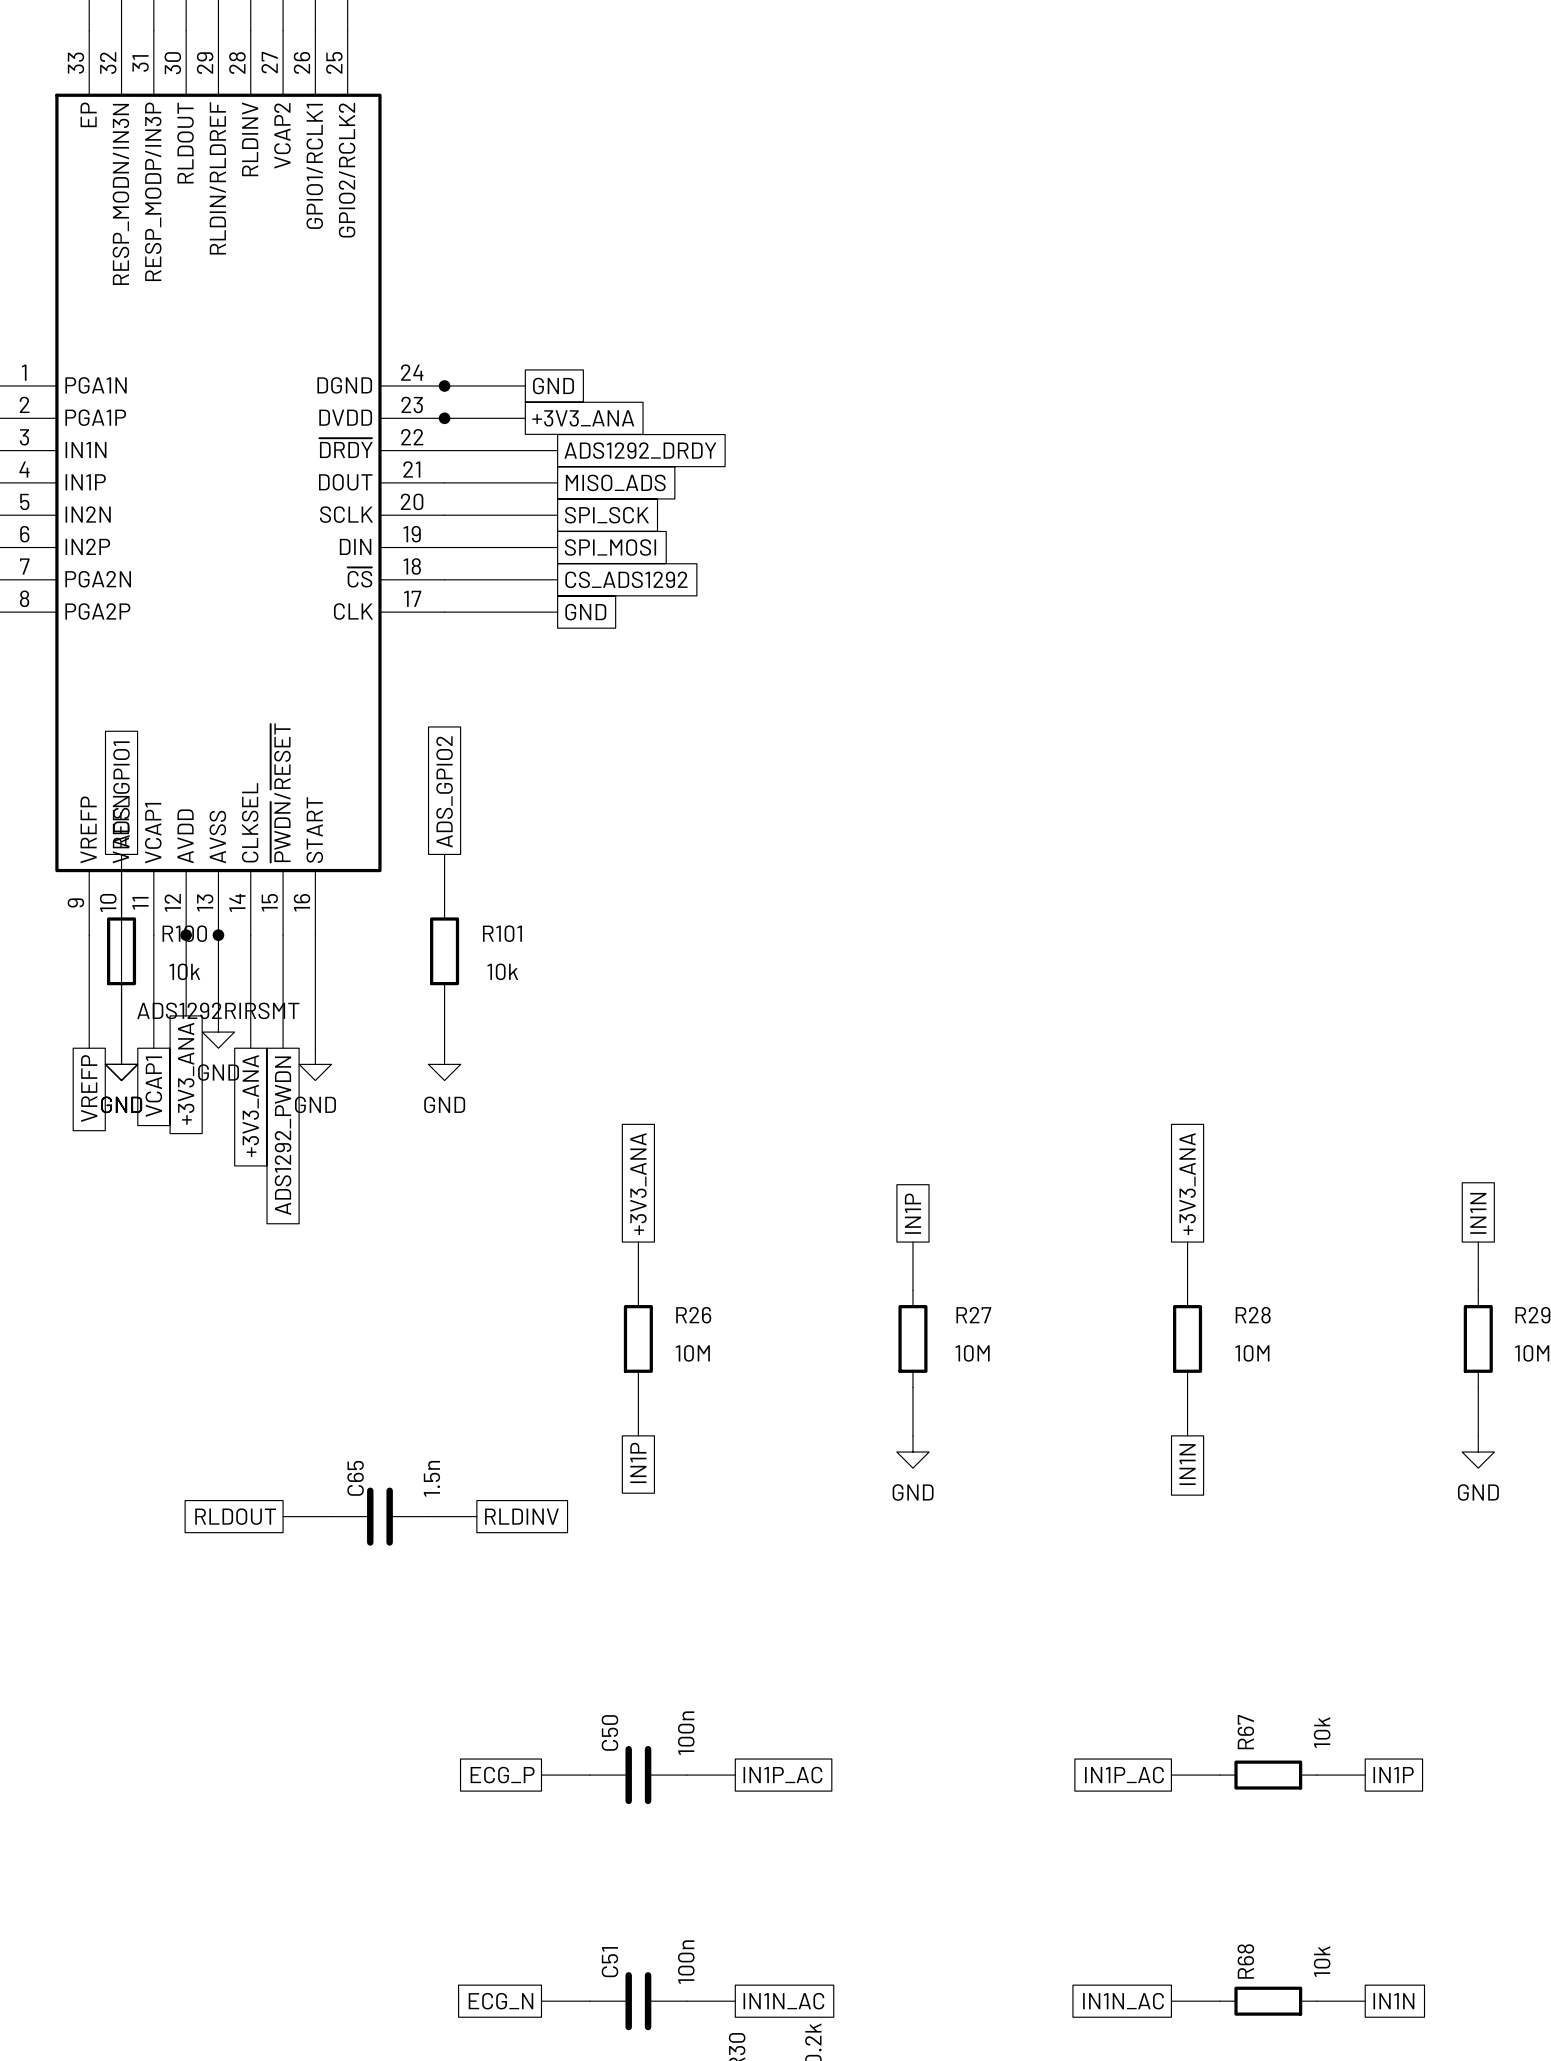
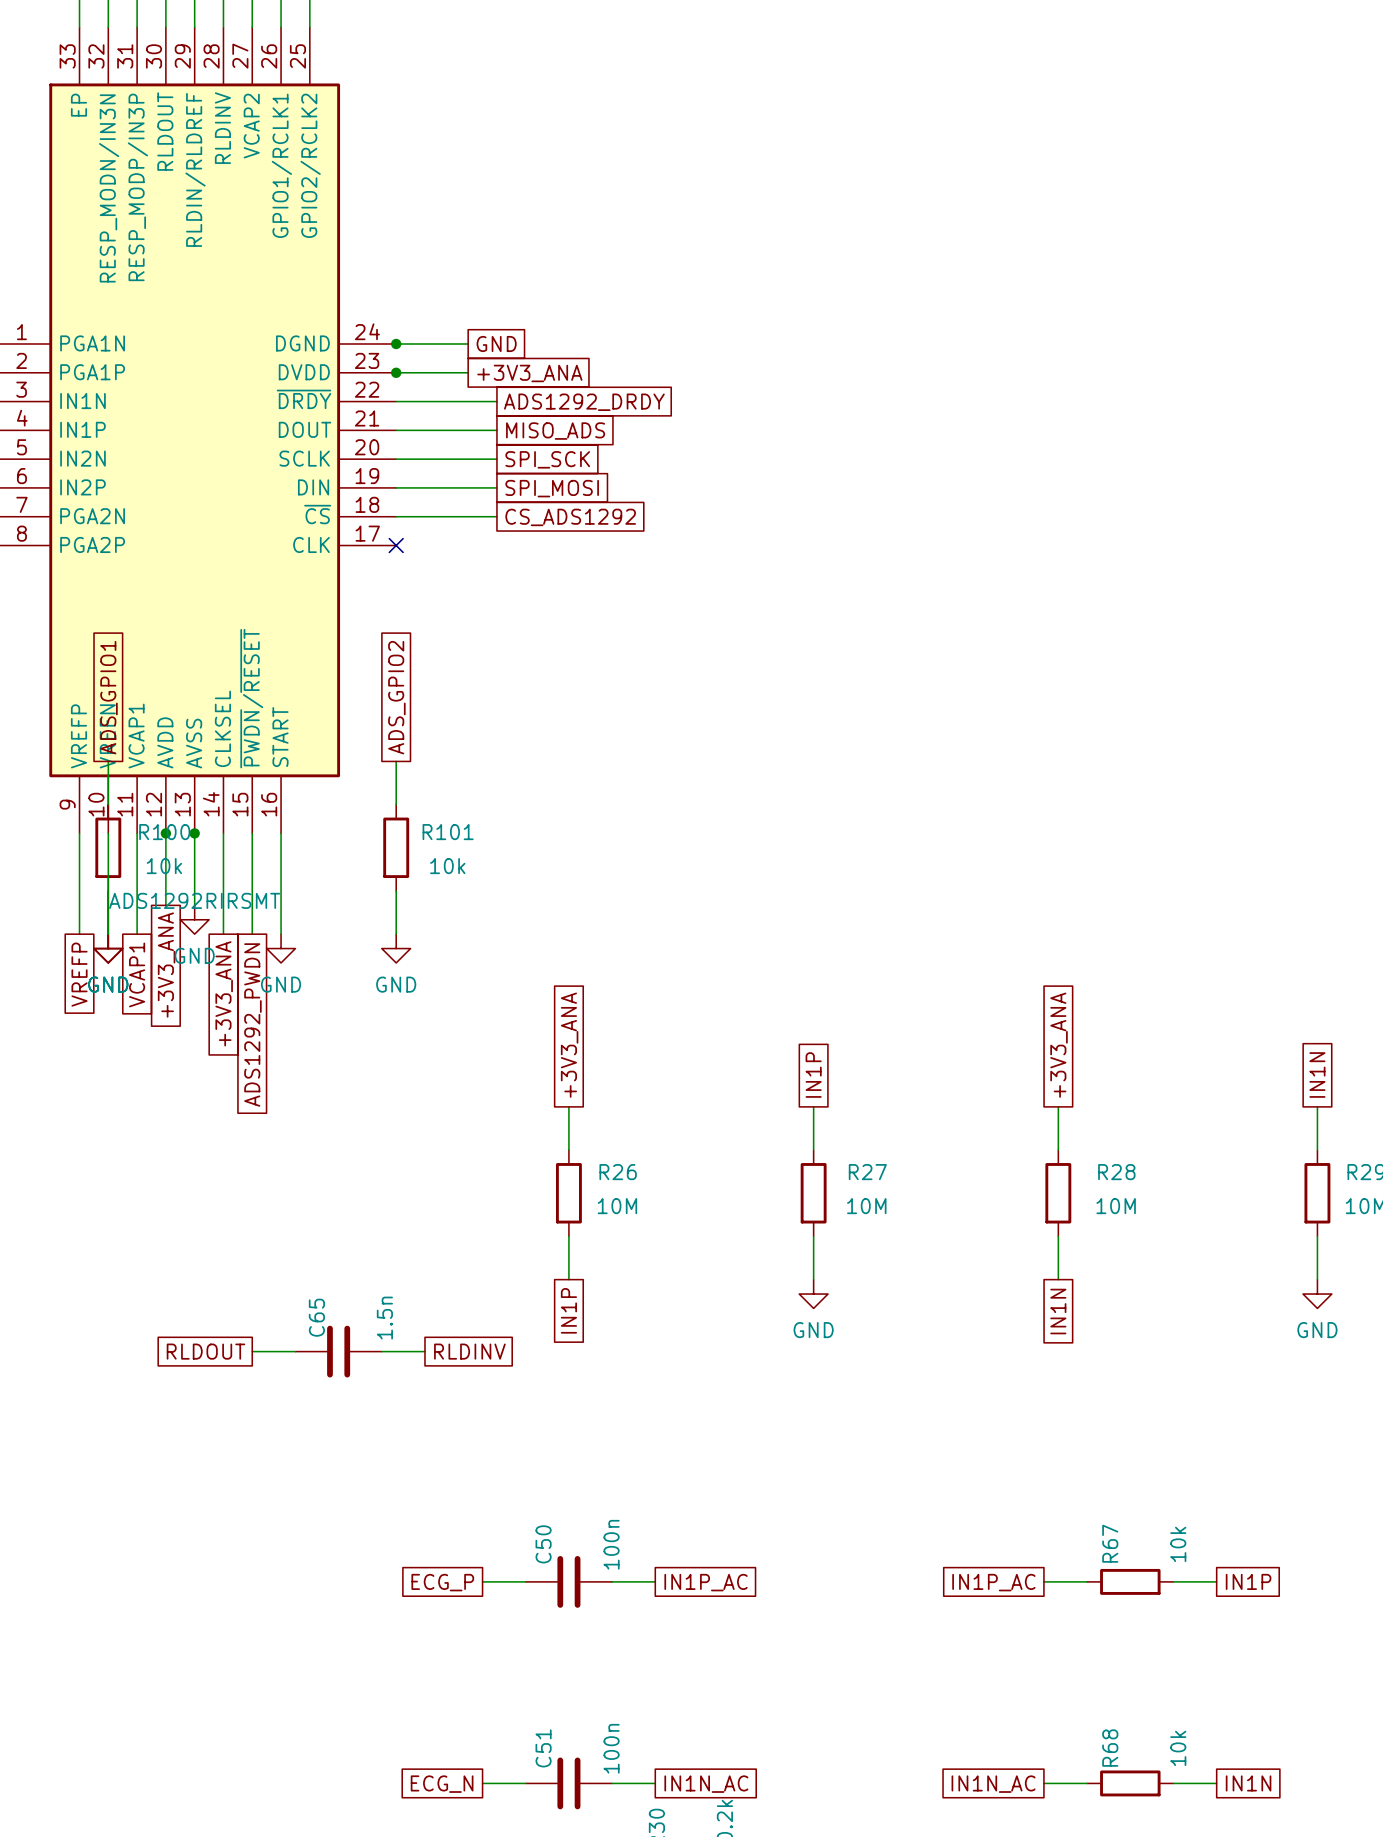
wire: (444, 612) (557, 612) -> none
no-connect mark: none -> (396, 545)
global label: GND (585, 612) -> none

